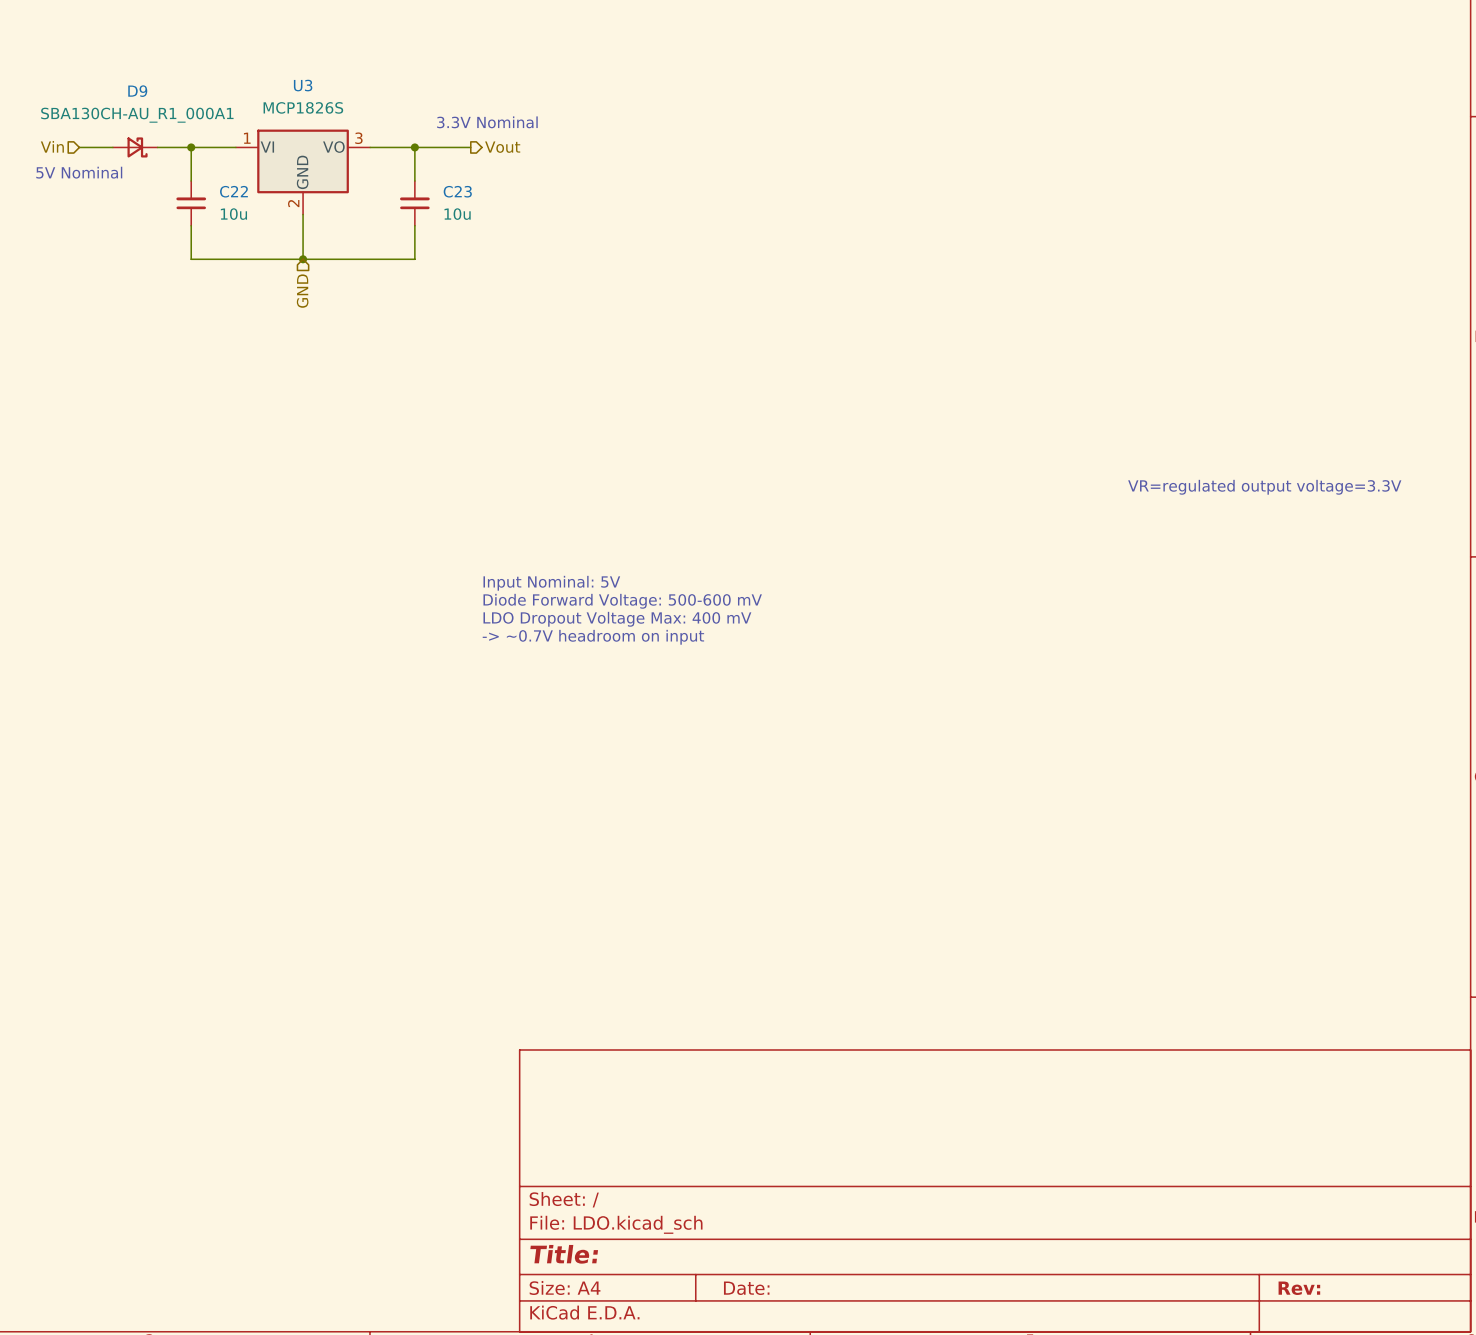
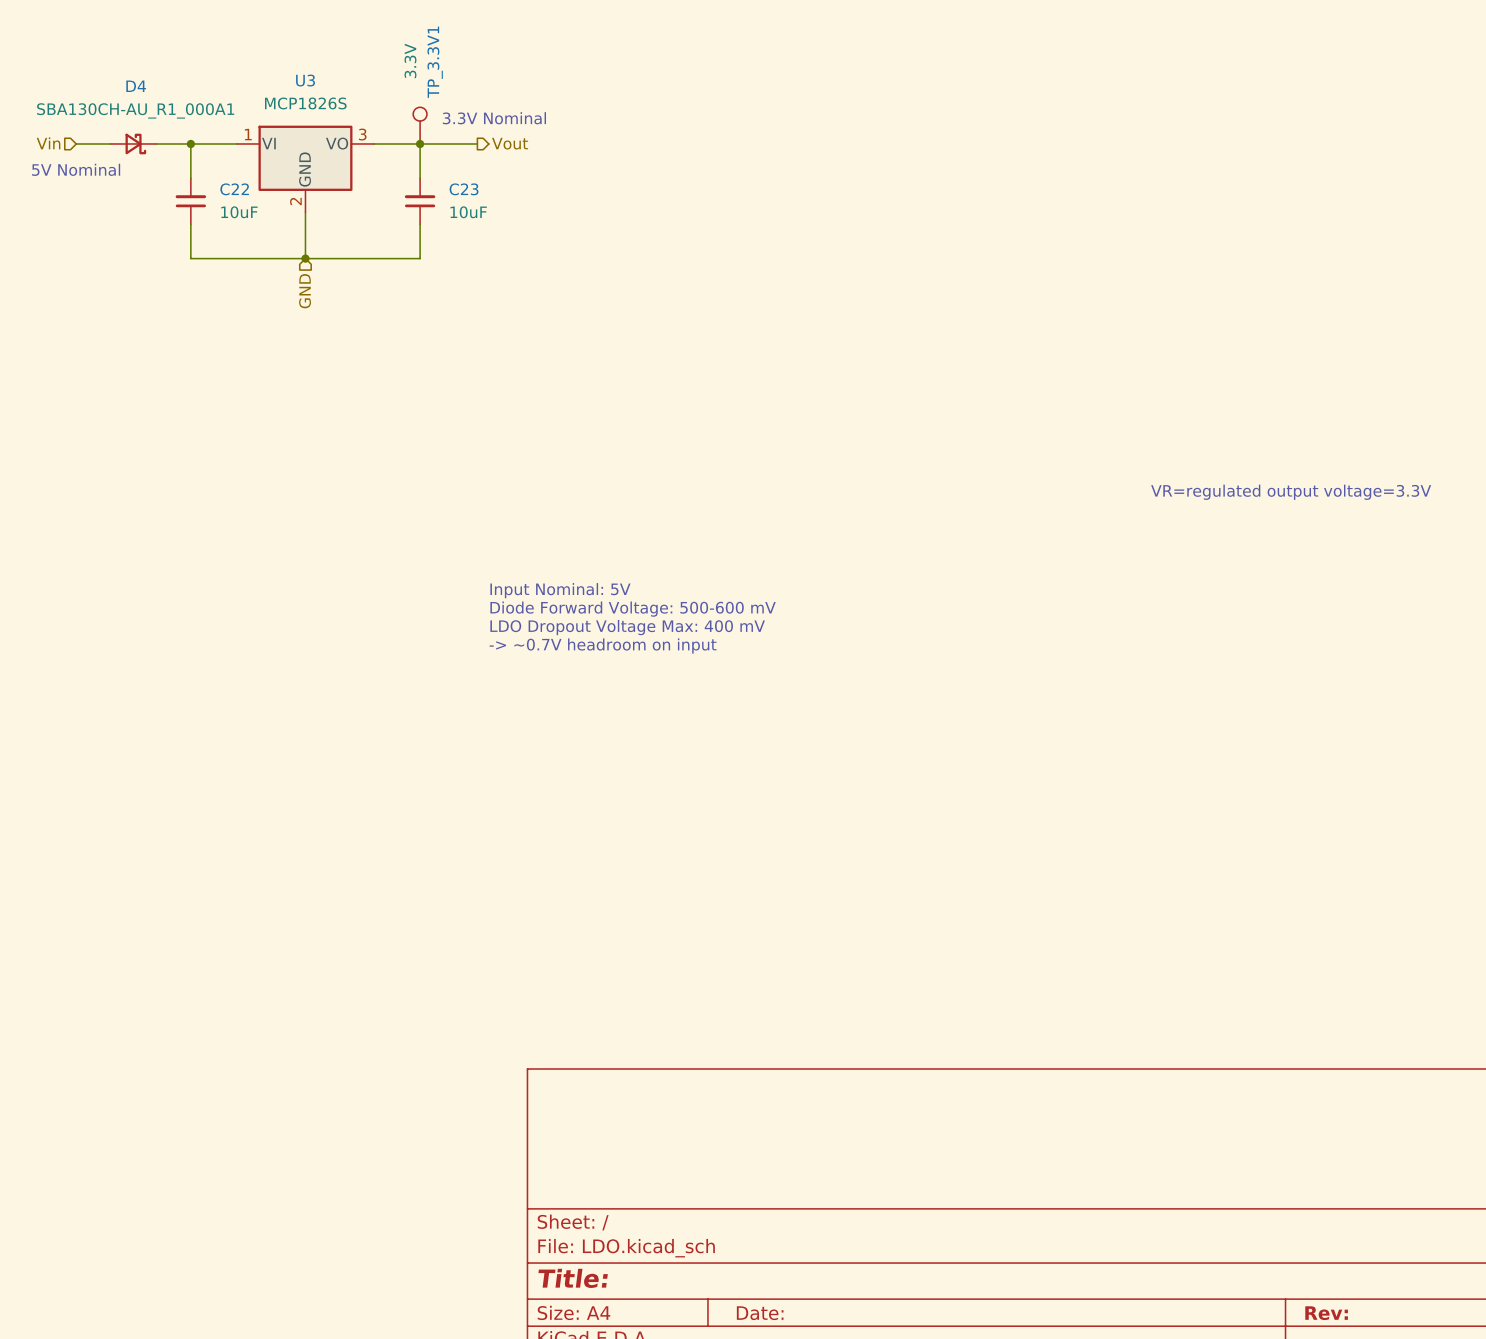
D9 name: D9 (137, 91) -> D4 (136, 86)
TP_3.3V1: none -> 3.3V (420, 125)
C22 value: 10u (233, 214) -> 10uF (239, 212)
C23 value: 10u (457, 214) -> 10uF (468, 212)

